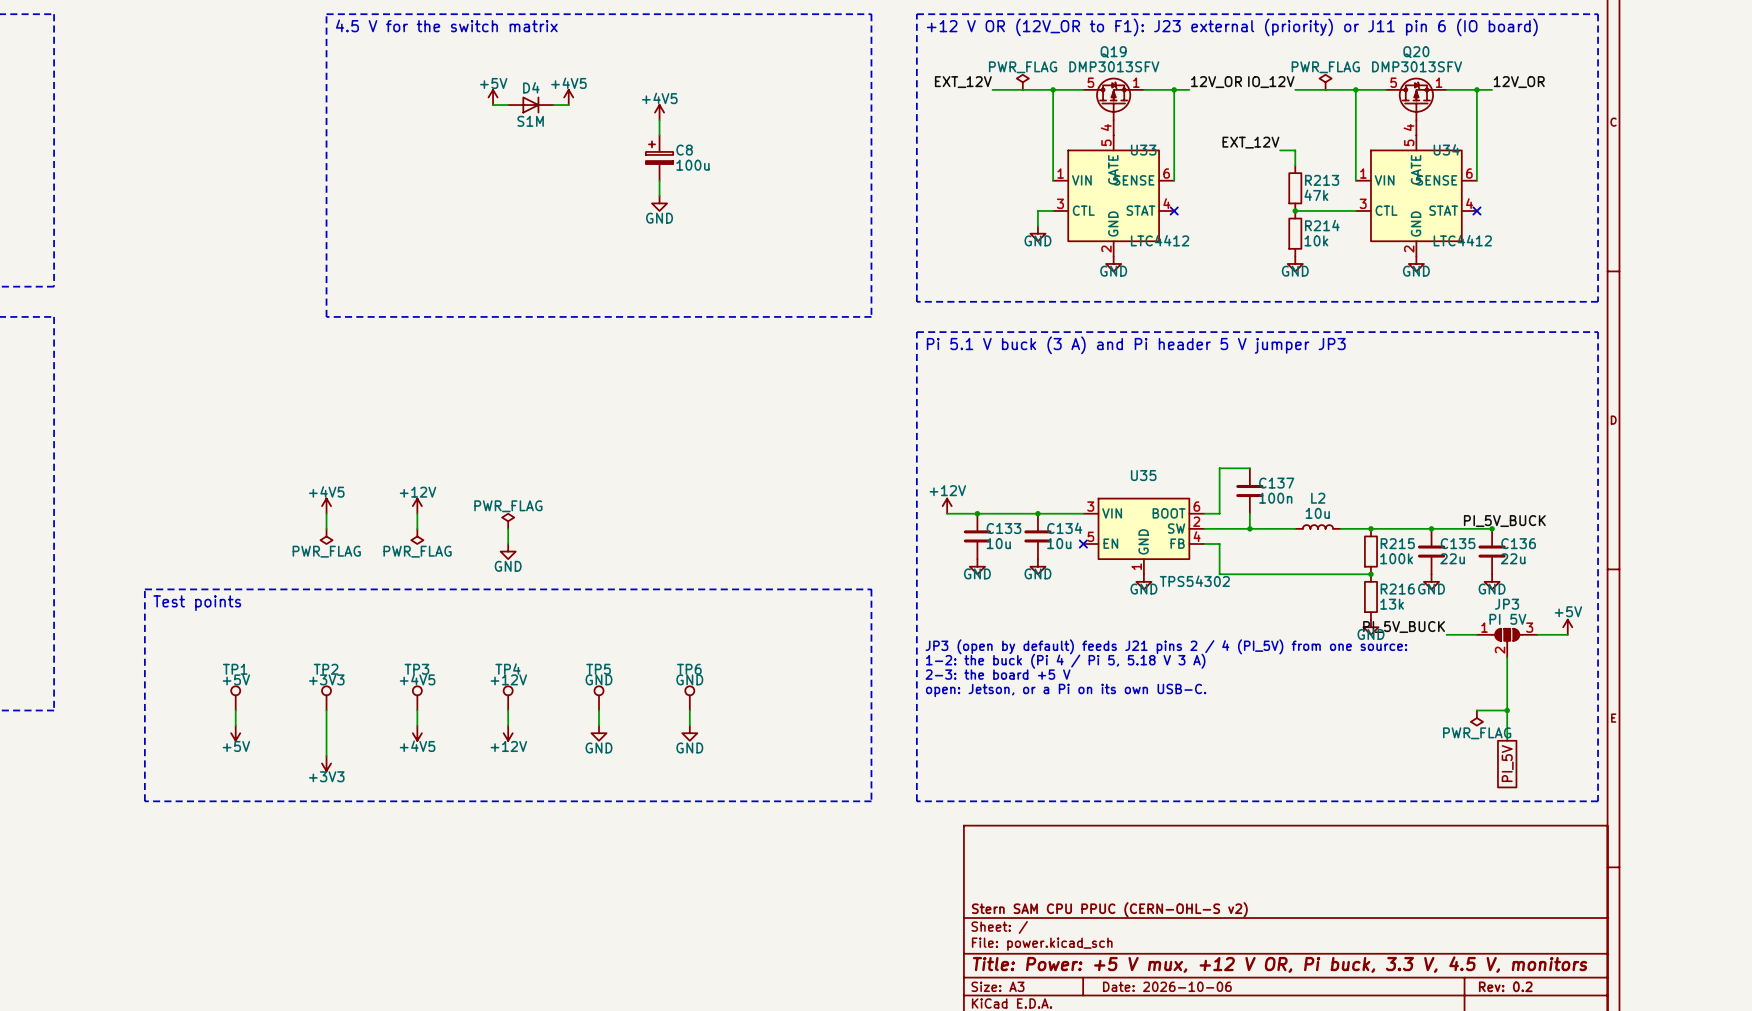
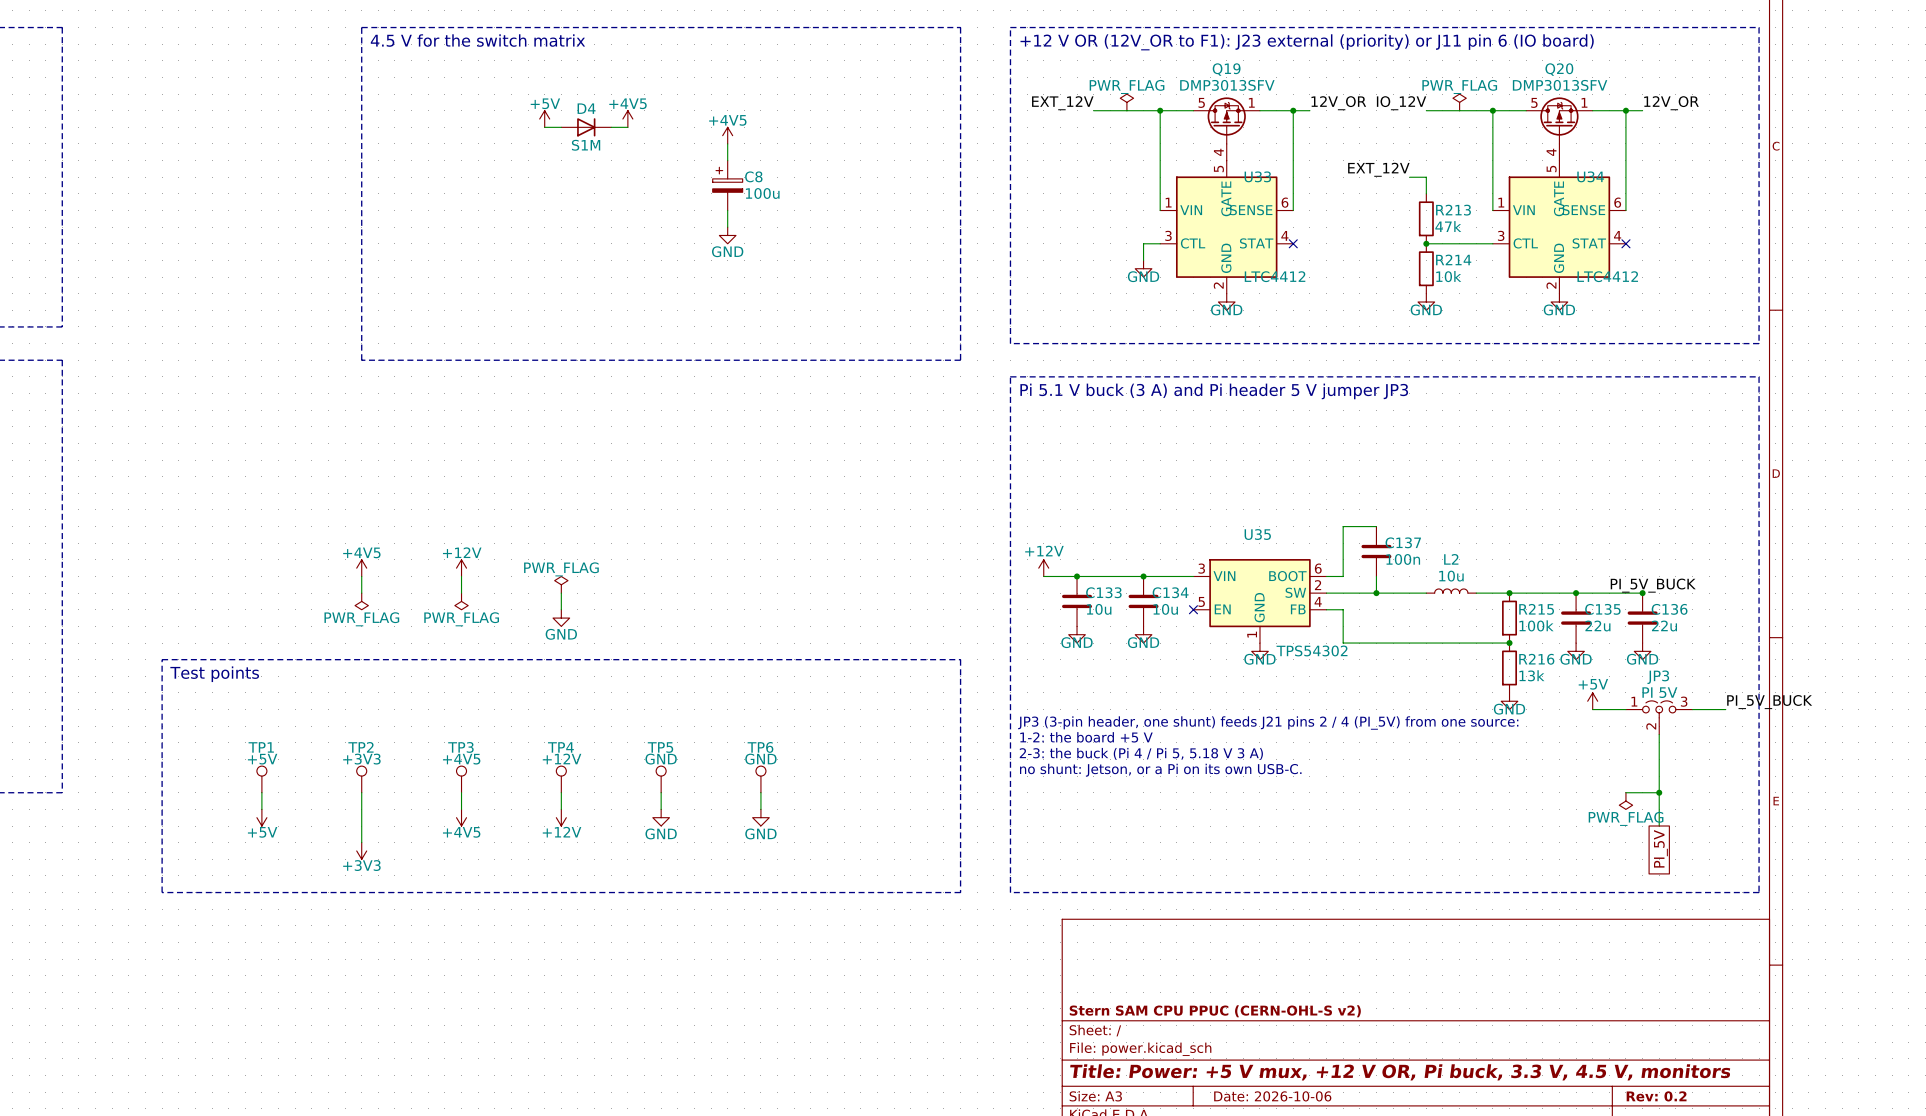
label position: PI_5V_BUCK (1404, 627) -> PI_5V_BUCK (1769, 702)
power symbol position: +5V (1567, 627) -> +5V (1592, 701)
JP3 symbol: [1476, 628, 1538, 658] -> [1625, 700, 1693, 735]
text: JP3 (open by default) feeds J21 pins 2 / 4 (PI_5V) from one source: (1166, 646) -> JP3 (3-pin header, one shunt) feeds J21 pins 2 / 4 (PI_5V) from one source: (1268, 723)
text: 1-2: the buck (Pi 4 / Pi 5, 5.18 V 3 A) (1065, 661) -> 1-2: the board +5 V (1086, 737)
text: 2-3: the board +5 V (998, 674) -> 2-3: the buck (Pi 4 / Pi 5, 5.18 V 3 A) (1141, 753)
text: open: Jetson, or a Pi on its own USB-C. (1066, 690) -> no shunt: Jetson, or a Pi on its own USB-C. (1160, 770)

